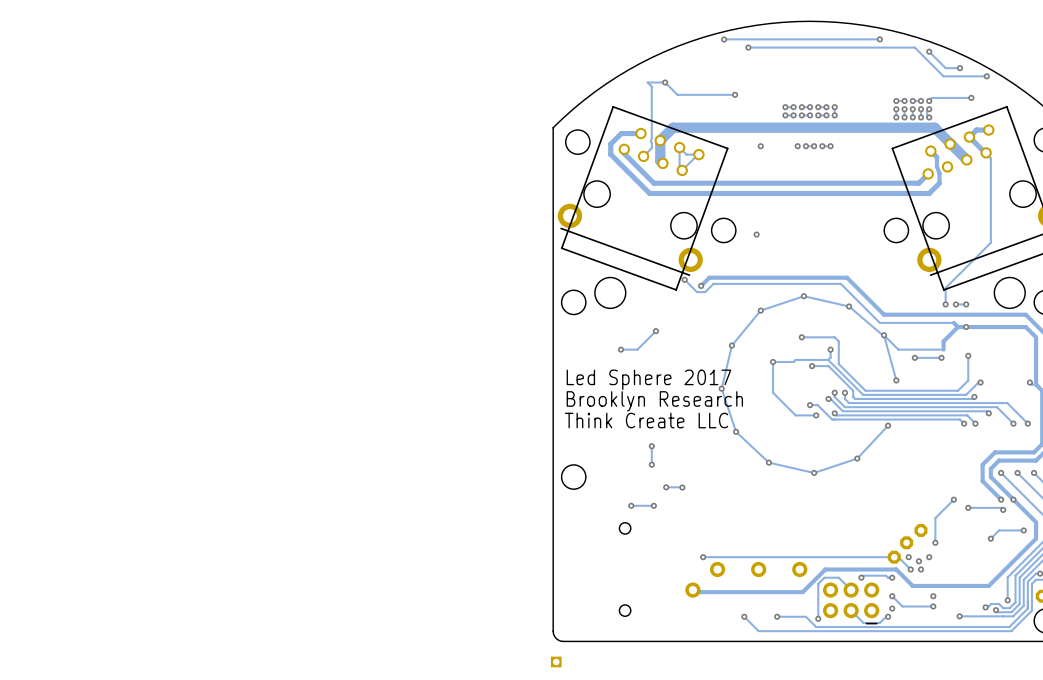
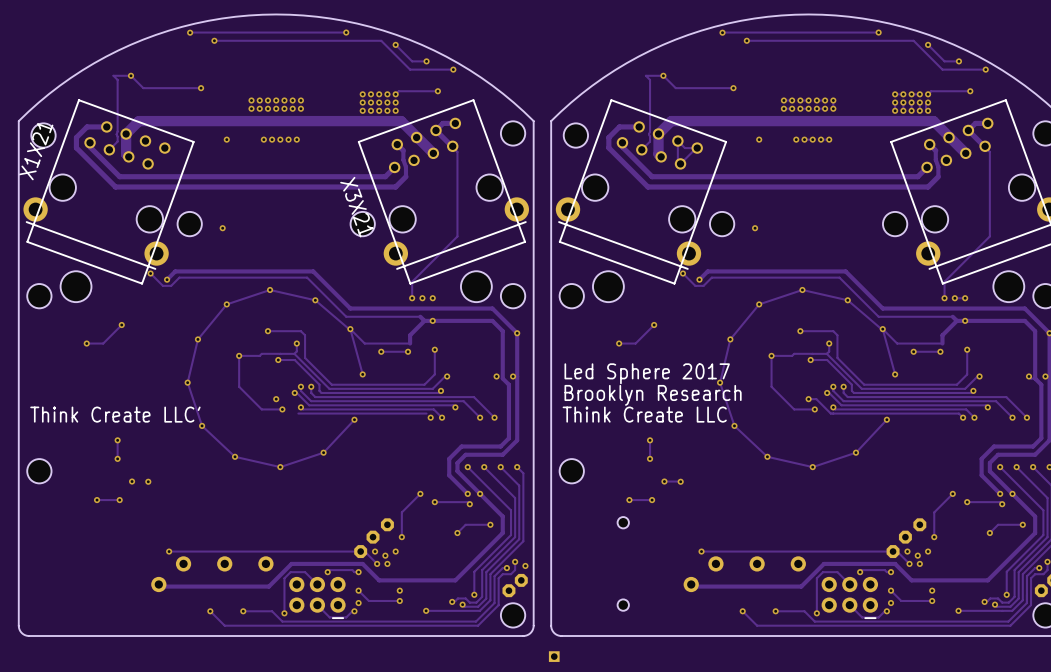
via: none -> (190, 32)
track: none -> (346, 32) (190, 32)
via: none -> (346, 32)
track: none -> (214, 40) (381, 40) (410, 69) (453, 69)
via: none -> (214, 40)
track: none -> (395, 44) (412, 61) (426, 61)
via: none -> (395, 44)
via: none -> (426, 61)
via: none -> (453, 69)
via: none -> (131, 75)
track: none -> (201, 88) (143, 88) (131, 75) (113, 75) (117, 79) (117, 141) (109, 149)
via: none -> (201, 88)
track: none -> (437, 91) (398, 91) (395, 94)
via: none -> (437, 91)
via: none -> (362, 94)
via: none -> (370, 94)
via: none -> (379, 94)
via: none -> (387, 94)
via: none -> (395, 94)
via: none -> (251, 100)
via: none -> (259, 100)
via: none -> (267, 100)
via: none -> (276, 100)
via: none -> (284, 100)
via: none -> (292, 100)
via: none -> (300, 100)
via: none -> (362, 102)
via: none -> (370, 102)
via: none -> (379, 102)
via: none -> (387, 102)
via: none -> (395, 102)
via: none -> (251, 108)
via: none -> (259, 108)
via: none -> (267, 108)
via: none -> (276, 108)
via: none -> (284, 108)
via: none -> (292, 108)
via: none -> (300, 108)
via: none -> (362, 110)
via: none -> (370, 110)
via: none -> (379, 110)
via: none -> (387, 110)
via: none -> (395, 110)
board edge: none -> (533, 121) (533, 625) (530, 632) (523, 635) (29, 635) (21, 632) (18, 625) (18, 121) (49, 93) (71, 77) (106, 56) (130, 44) (168, 30) (208, 20) (235, 16) (276, 14) (316, 16) (343, 20) (383, 30) (421, 44) (446, 56) (481, 77) (503, 93) (533, 121)
track: none -> (455, 123) (443, 123) (436, 130) (451, 146)
track: none -> (106, 126) (87, 126) (76, 137) (76, 147) (115, 187) (395, 187) (405, 176) (403, 150) (397, 144)
hole: none -> (513, 133)
hole: none -> (43, 135)
via: none -> (226, 139)
via: none -> (263, 139)
via: none -> (272, 139)
via: none -> (280, 139)
via: none -> (288, 139)
via: none -> (296, 139)
track: none -> (90, 142) (90, 147) (119, 176) (385, 176) (394, 167)
track: none -> (451, 146) (457, 151) (457, 236) (412, 281) (412, 298)
track: none -> (433, 153) (401, 121) (139, 121) (126, 133) (126, 154) (128, 156)
X1X21: none -> (108, 191)
X3X21: none -> (443, 191)
hole: none -> (189, 224)
hole: none -> (362, 224)
via: none -> (222, 228)
track: none -> (150, 273) (162, 285) (171, 285) (179, 277) (307, 277) (346, 316) (420, 316) (424, 320)
via: none -> (150, 273)
track: none -> (167, 279) (175, 271) (313, 271) (350, 308) (492, 308) (517, 333) (517, 440) (502, 454) (465, 454) (457, 462) (457, 471) (502, 516) (502, 533) (455, 580) (379, 580) (362, 563) (291, 563) (268, 586) (160, 586) (158, 584)
via: none -> (167, 279)
hole: none -> (76, 286)
hole: none -> (476, 286)
via: none -> (270, 289)
hole: none -> (39, 296)
hole: none -> (513, 296)
via: none -> (412, 298)
via: none -> (422, 298)
via: none -> (432, 298)
via: none -> (315, 300)
via: none -> (226, 304)
track: none -> (424, 320) (492, 320) (502, 331) (502, 378) (508, 384) (508, 438) (500, 446) (461, 446) (449, 458) (449, 475) (467, 493)
track: none -> (424, 320) (410, 335) (410, 343) (364, 343) (350, 329) (350, 331)
via: none -> (432, 320)
track: none -> (121, 325) (103, 343) (86, 343)
via: none -> (121, 325)
via: none -> (350, 329)
track: none -> (267, 331) (300, 331) (305, 335) (305, 357) (331, 384) (424, 384) (434, 374) (434, 349)
via: none -> (267, 331)
track: none -> (350, 331) (362, 374)
track: none -> (350, 331) (315, 300) (270, 289) (226, 304) (197, 339) (187, 382) (202, 425) (235, 456) (280, 467) (323, 452) (354, 419)
via: none -> (517, 333)
via: none -> (197, 339)
via: none -> (86, 343)
track: none -> (296, 343) (296, 351) (294, 353)
via: none -> (296, 343)
via: none -> (434, 349)
via: none -> (381, 351)
track: none -> (408, 351) (381, 351)
via: none -> (408, 351)
track: none -> (294, 353) (239, 355) (239, 386) (261, 409) (282, 409)
track: none -> (294, 353) (329, 388) (432, 388) (447, 376)
via: none -> (239, 355)
track: none -> (278, 360) (294, 360) (319, 384) (321, 392) (438, 392) (440, 390)
via: none -> (278, 360)
via: none -> (362, 374)
via: none -> (447, 376)
via: none -> (496, 376)
via: none -> (513, 376)
via: none -> (187, 382)
track: none -> (300, 386) (300, 390) (311, 401) (463, 401) (480, 417)
via: none -> (300, 386)
track: none -> (311, 386) (311, 392) (315, 397) (473, 397) (494, 417)
via: none -> (311, 386)
via: none -> (440, 390)
track: none -> (294, 392) (309, 405) (453, 405) (455, 407)
via: none -> (294, 392)
via: none -> (276, 399)
track: none -> (300, 407) (303, 409) (433, 409) (442, 417)
via: none -> (300, 407)
via: none -> (455, 407)
via: none -> (282, 409)
track: none -> (426, 413) (298, 413)
text: none -> Think Create LLC' (115, 414)
via: none -> (430, 417)
via: none -> (442, 417)
via: none -> (480, 417)
via: none -> (494, 417)
via: none -> (354, 419)
via: none -> (202, 425)
track: none -> (117, 440) (117, 458)
via: none -> (117, 440)
via: none -> (323, 452)
via: none -> (235, 456)
via: none -> (117, 458)
via: none -> (280, 467)
track: none -> (467, 467) (511, 510) (511, 535) (474, 571) (474, 594)
via: none -> (467, 467)
track: none -> (484, 467) (515, 498) (515, 537) (482, 570) (482, 596) (476, 602) (469, 602) (465, 598) (457, 598) (452, 601)
via: none -> (484, 467)
track: none -> (500, 467) (519, 485) (519, 539) (486, 572) (486, 598) (478, 606) (464, 606) (462, 604)
via: none -> (500, 467)
track: none -> (517, 467) (523, 473) (523, 541) (490, 574) (490, 600) (479, 610) (426, 610)
via: none -> (517, 467)
hole: none -> (39, 471)
via: none -> (132, 481)
via: none -> (148, 481)
track: none -> (420, 493) (401, 512) (401, 537)
via: none -> (420, 493)
via: none -> (467, 493)
via: none -> (480, 493)
via: none -> (97, 500)
track: none -> (119, 500) (94, 500)
via: none -> (119, 500)
track: none -> (434, 502) (467, 502) (469, 504)
via: none -> (434, 502)
via: none -> (469, 504)
part: none -> (387, 524)
track: none -> (490, 524) (465, 524) (457, 533)
via: none -> (490, 524)
via: none -> (457, 533)
part: none -> (373, 537)
via: none -> (401, 537)
track: none -> (169, 551) (364, 551) (377, 563)
via: none -> (169, 551)
part: none -> (360, 551)
via: none -> (375, 551)
via: none -> (395, 551)
via: none -> (385, 555)
track: none -> (515, 561) (515, 570) (511, 574) (502, 574) (498, 578) (498, 605) (478, 625) (224, 625) (210, 611)
via: none -> (515, 561)
part: none -> (183, 563)
part: none -> (224, 563)
part: none -> (265, 563)
via: none -> (377, 563)
via: none -> (387, 563)
via: none -> (525, 565)
track: none -> (506, 568) (502, 568) (494, 576) (494, 603) (476, 621) (282, 621) (272, 611) (243, 611)
via: none -> (506, 568)
via: none -> (327, 572)
track: none -> (358, 572) (352, 570) (329, 570) (327, 572)
via: none -> (358, 572)
part: none -> (521, 580)
part: none -> (158, 584)
track: none -> (317, 584) (305, 572) (290, 572) (284, 578) (284, 613)
track: none -> (358, 590) (368, 600) (399, 600)
via: none -> (358, 590)
via: none -> (399, 590)
part: none -> (508, 590)
via: none -> (474, 594)
part: none -> (317, 597)
via: none -> (399, 600)
via: none -> (452, 601)
via: none -> (358, 603)
track: none -> (317, 605) (329, 617) (346, 617) (354, 611)
via: none -> (462, 604)
via: none -> (210, 611)
via: none -> (243, 611)
via: none -> (354, 611)
via: none -> (426, 610)
via: none -> (284, 613)
hole: none -> (513, 615)

